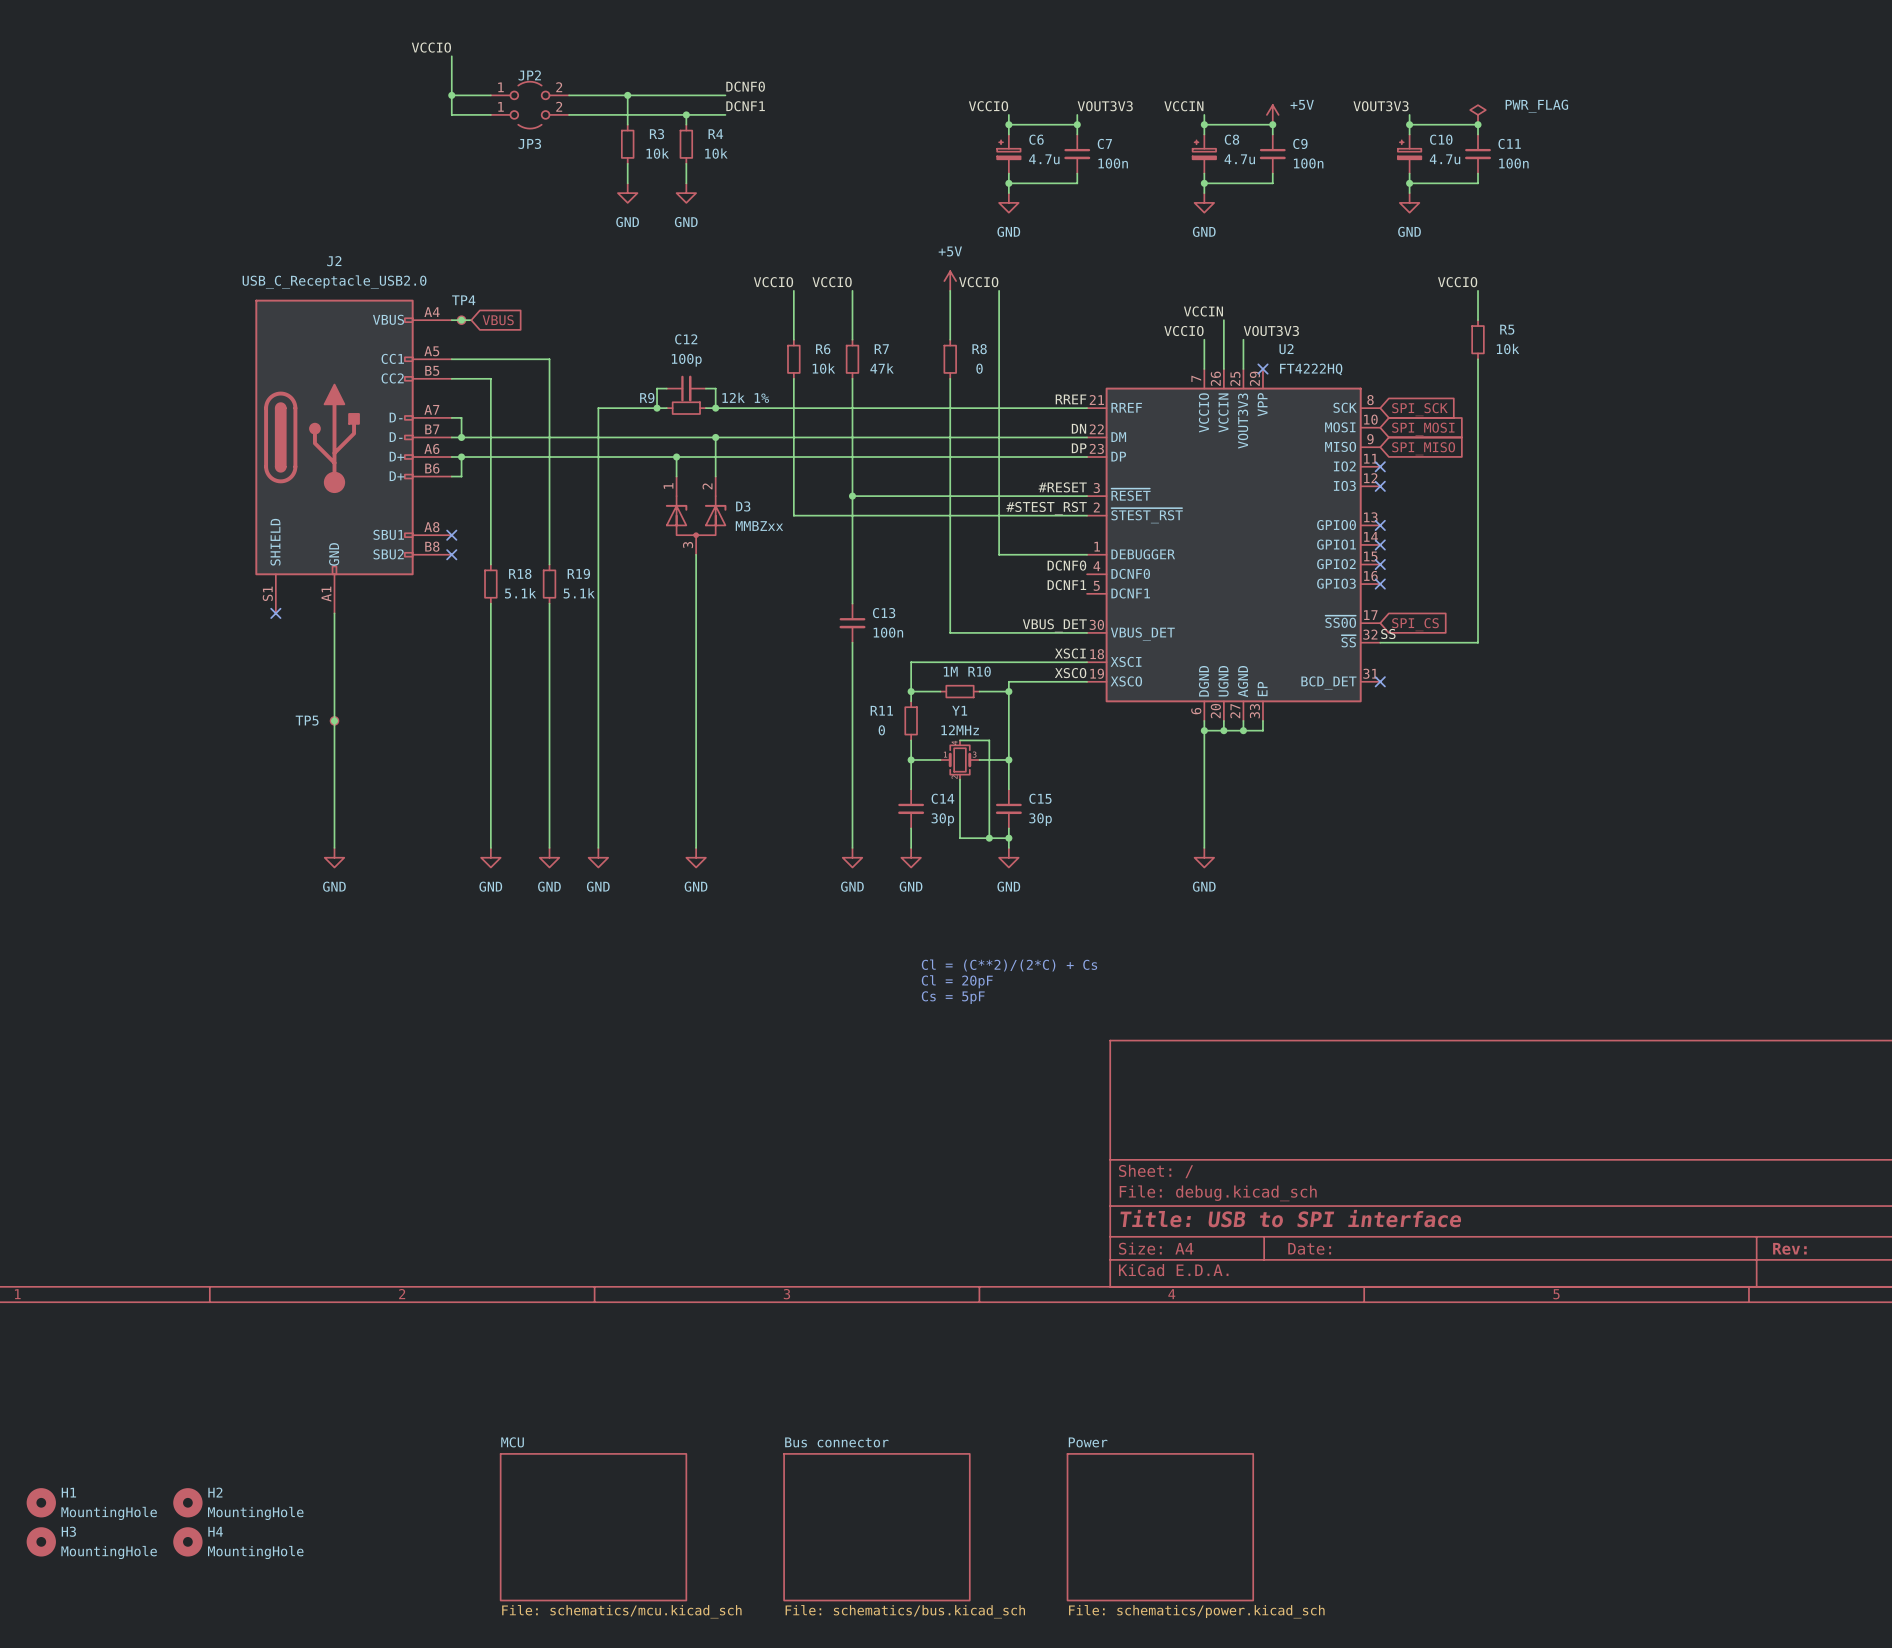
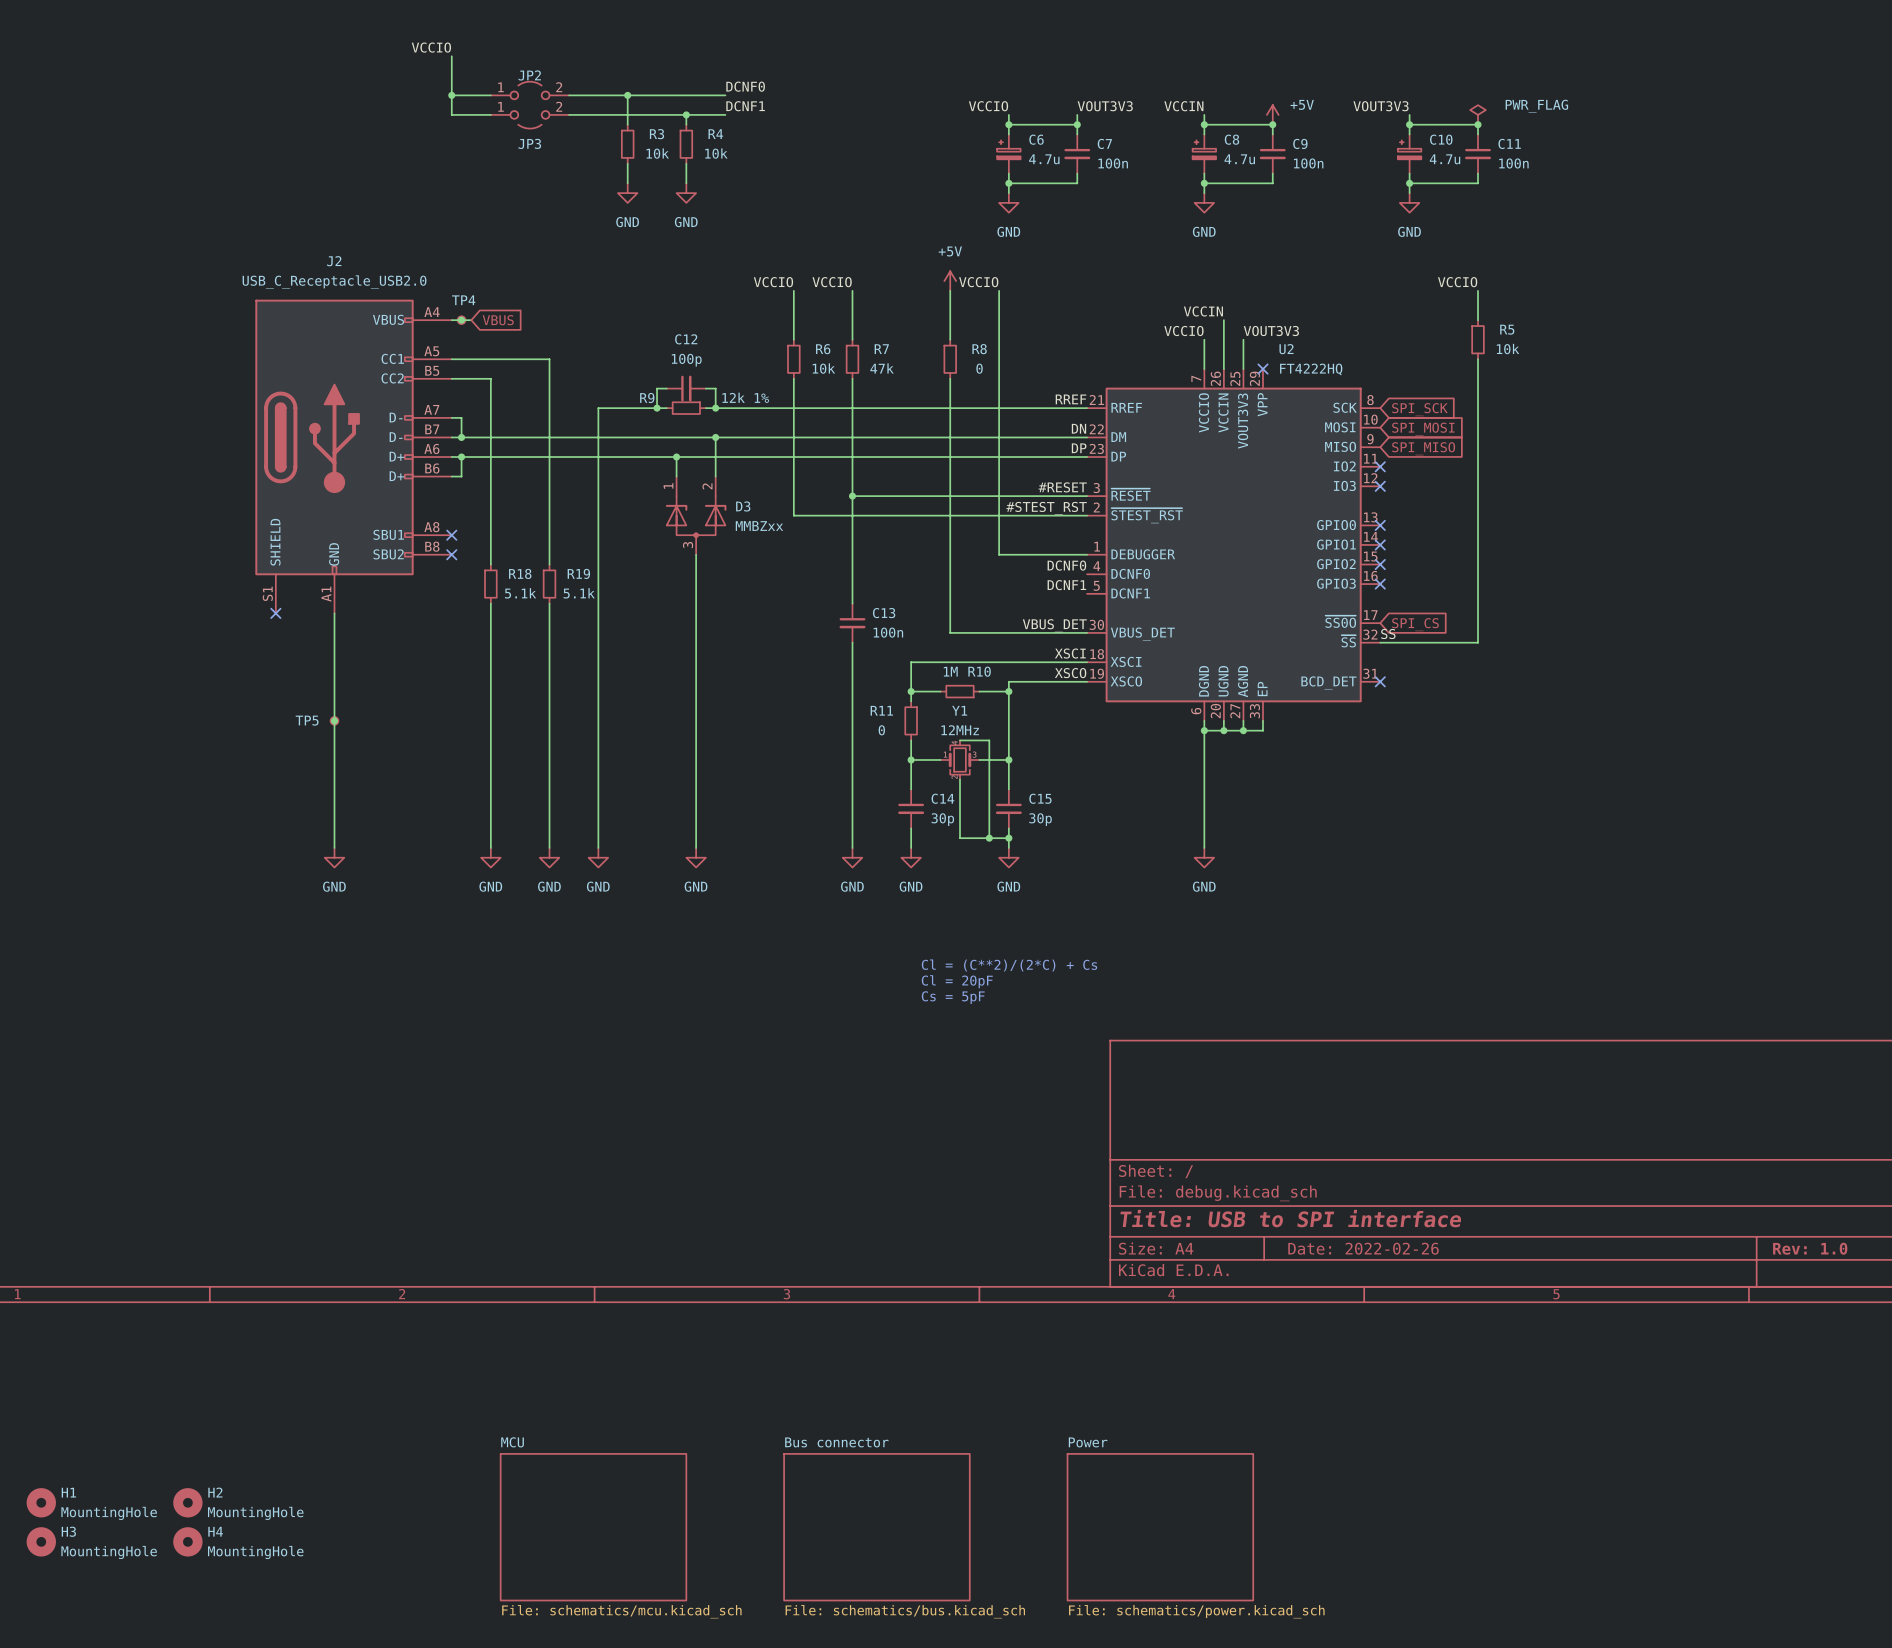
title block: Date: (1309, 1248) -> Date: 2022-02-26 (1363, 1248)
title block: Rev: (1789, 1248) -> Rev: 1.0 (1810, 1248)

